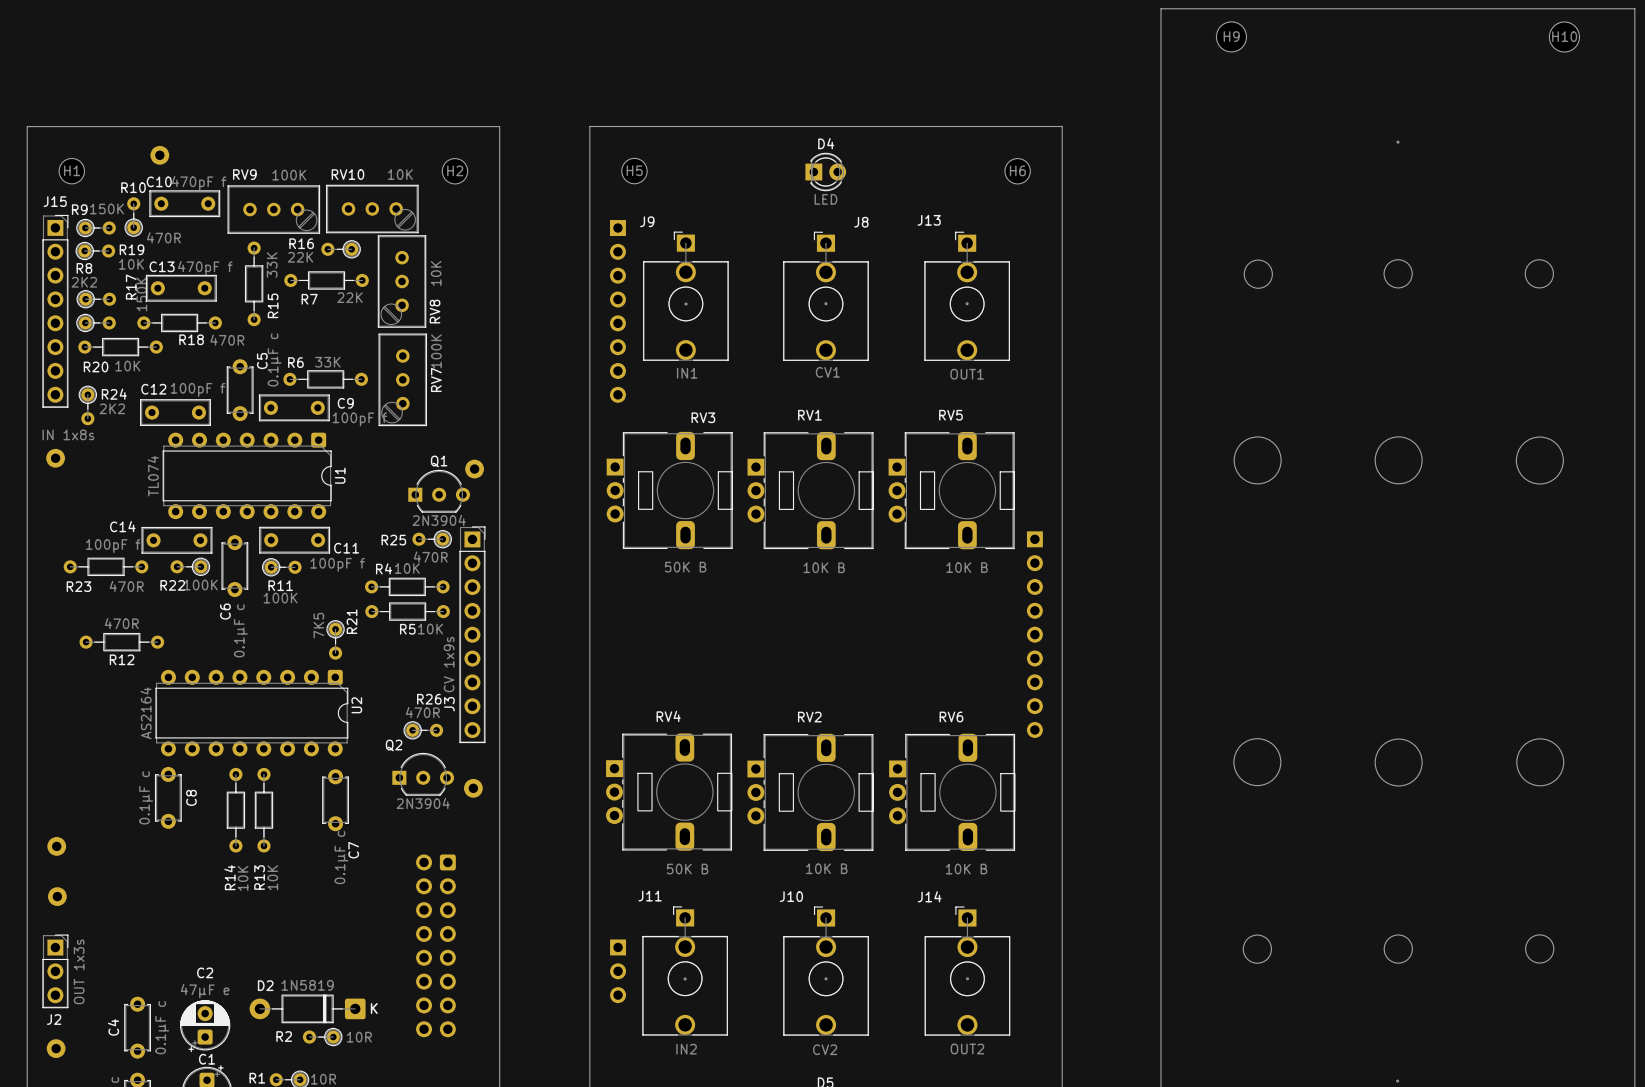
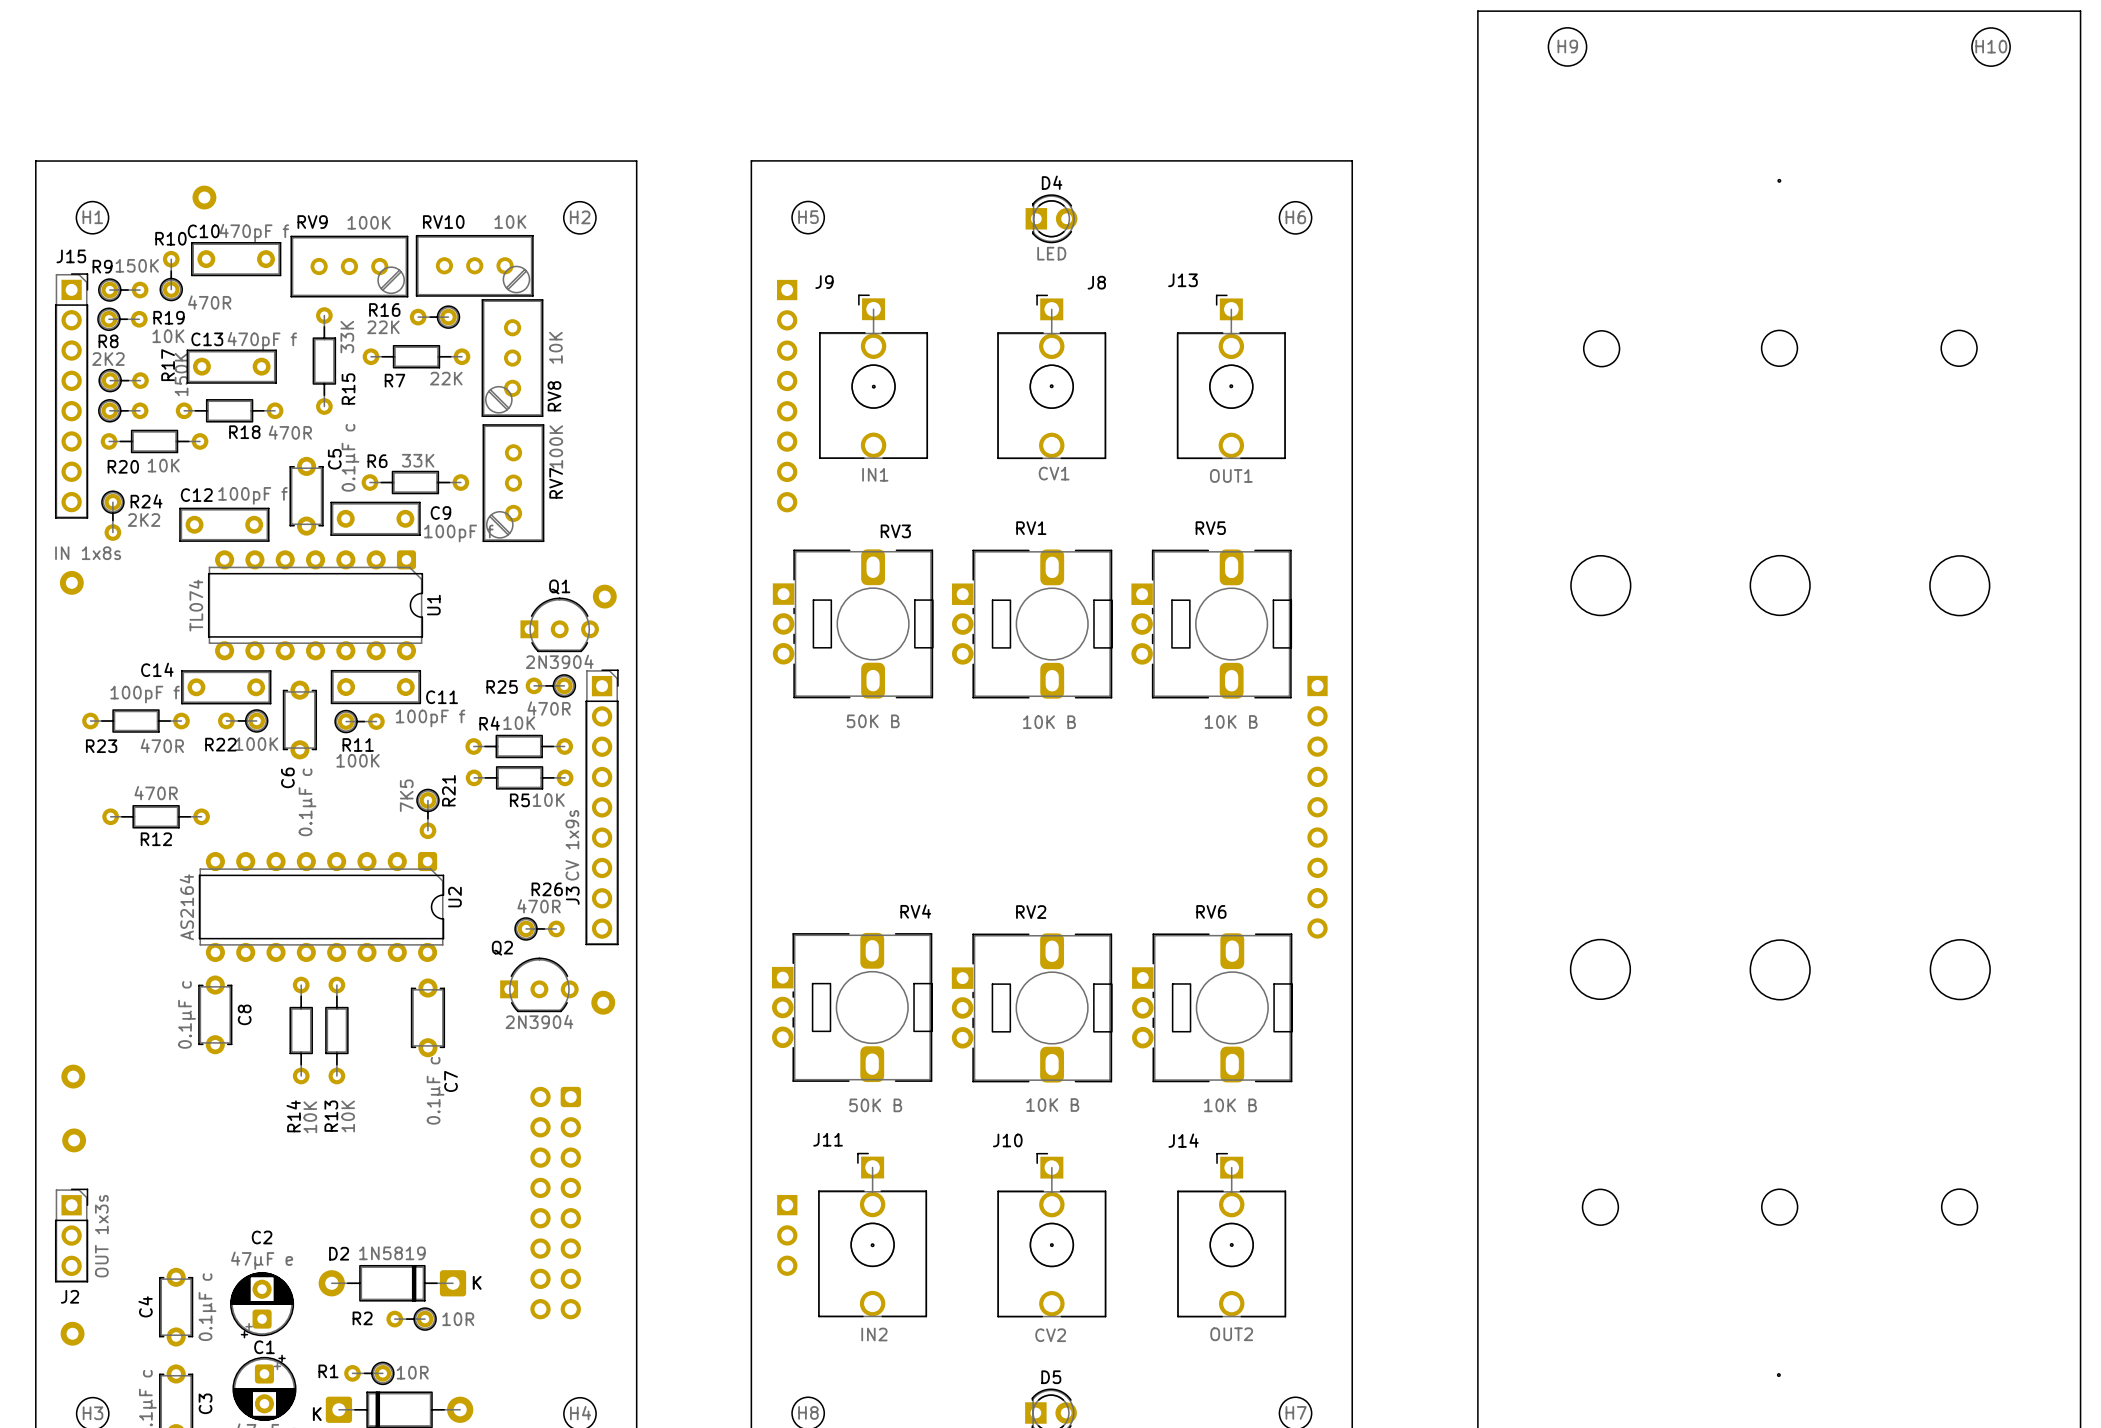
RV4 name position: RV4 (668, 716) -> RV4 (915, 911)

